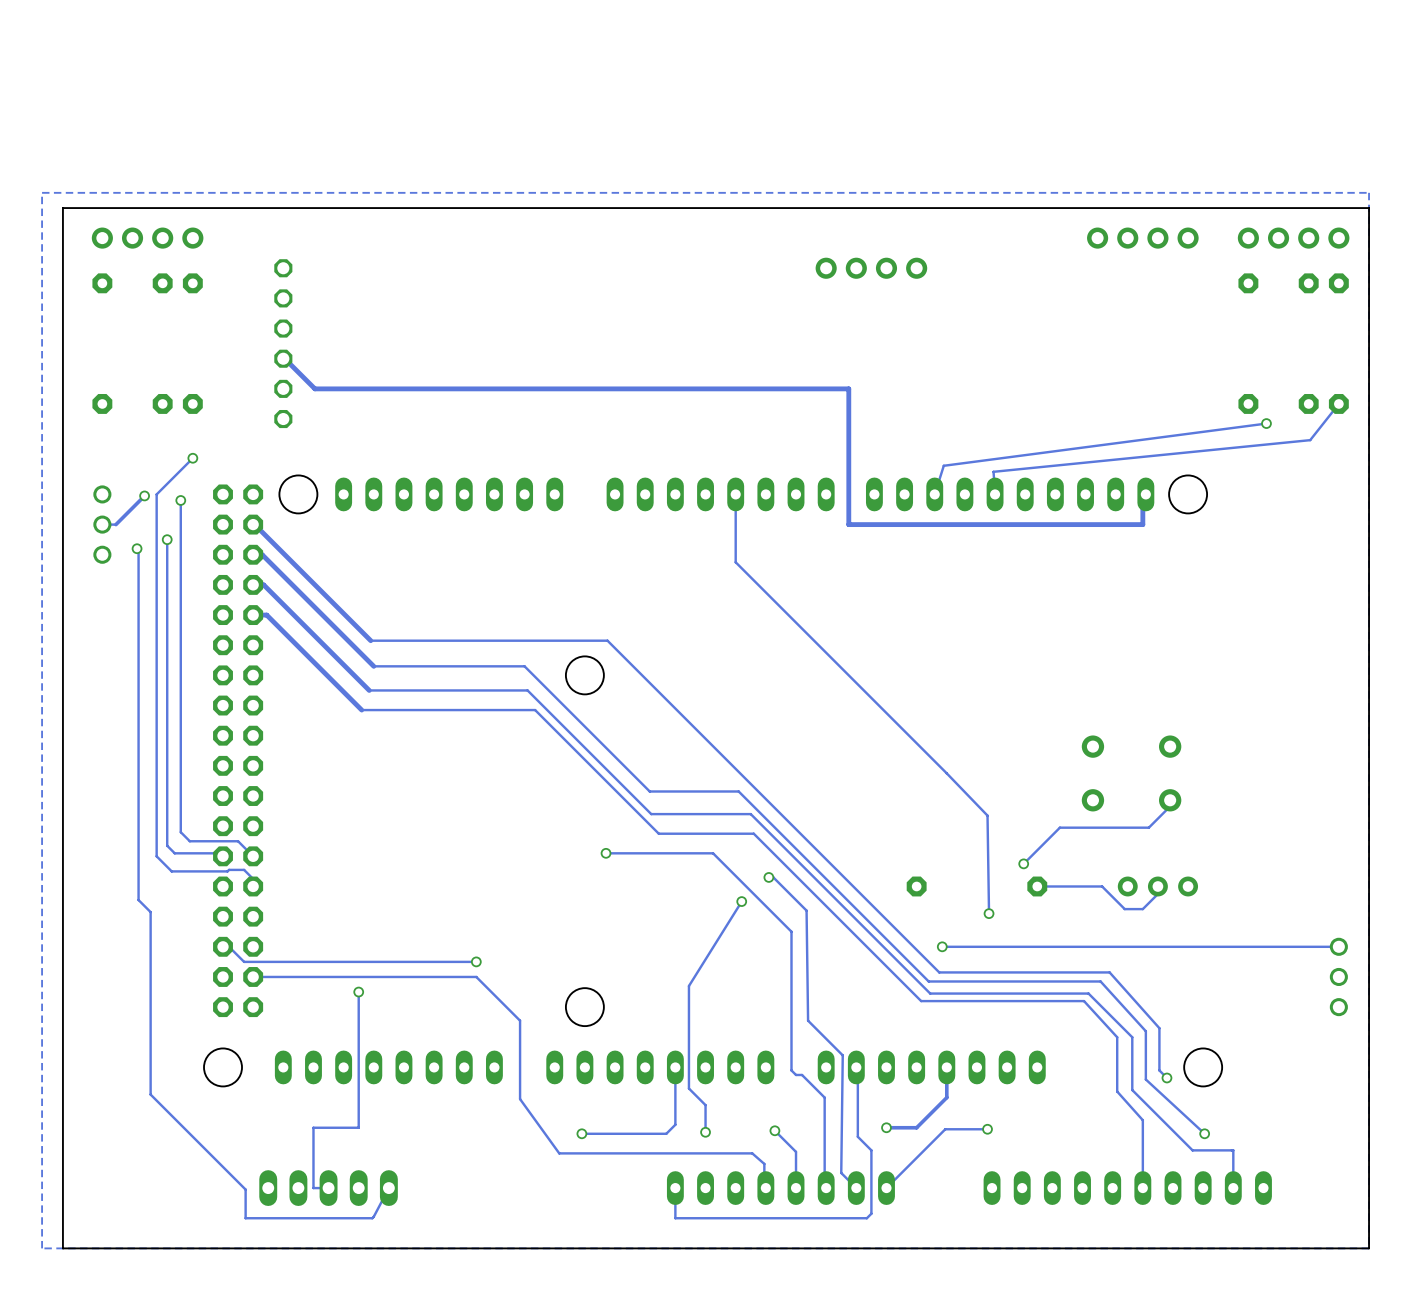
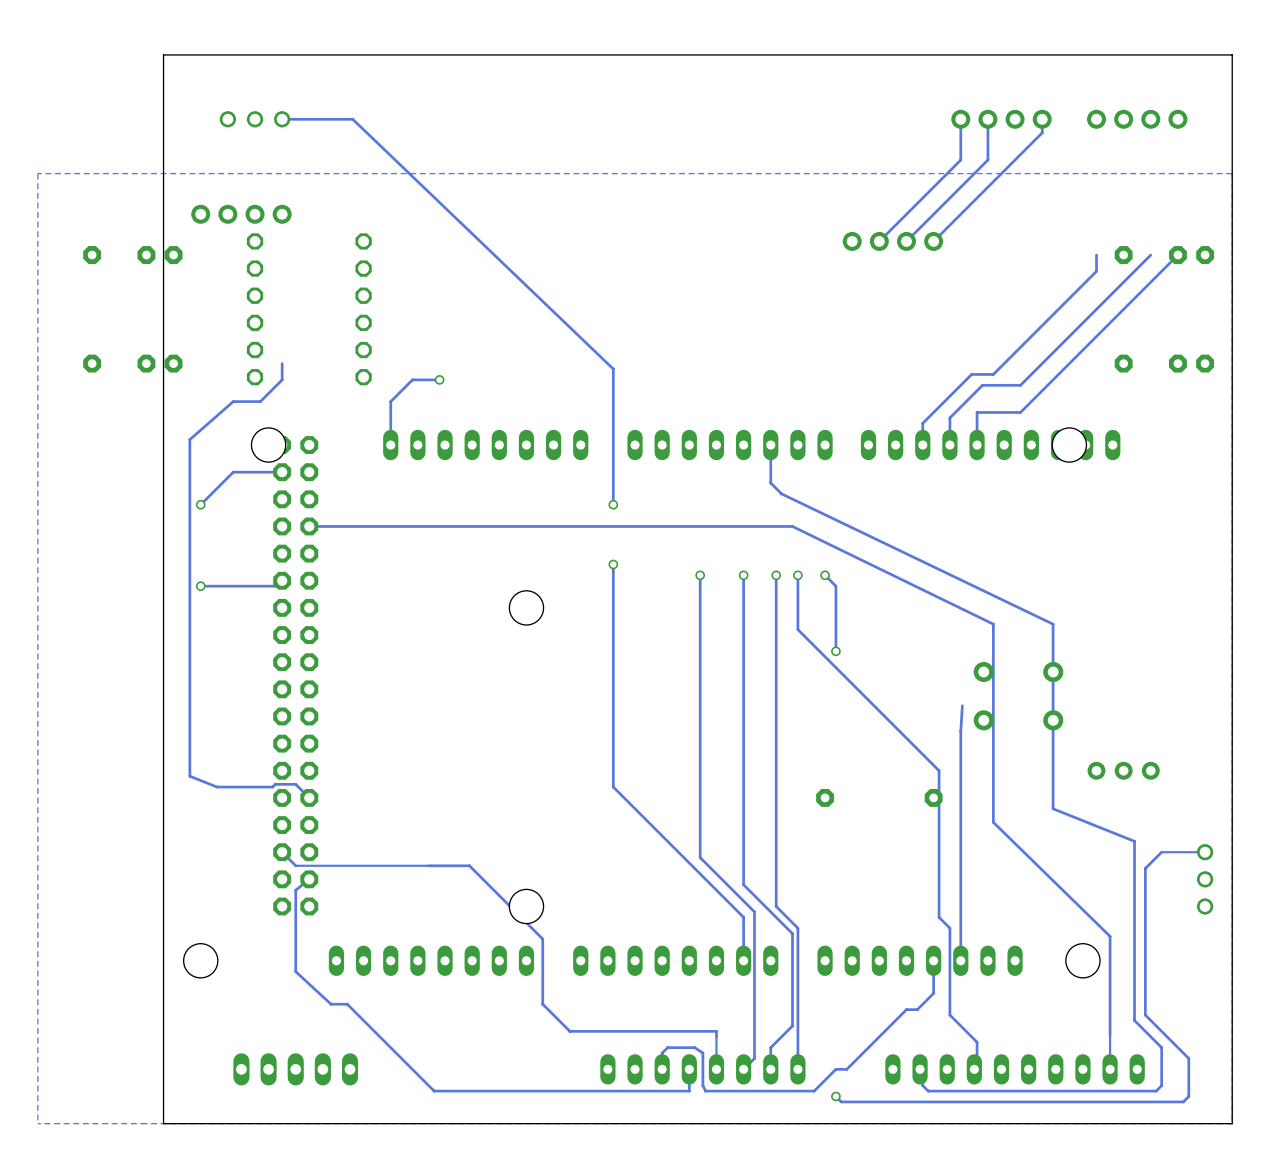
part: none -> (255, 119)
track: none -> (282, 119) (352, 119) (613, 369) (613, 504)
track: none -> (960, 119) (960, 160) (879, 241)
track: none -> (987, 119) (987, 160) (906, 241)
part: none -> (1001, 119)
track: none -> (1042, 119) (1042, 132) (933, 241)
part: none -> (1137, 119)
board edge: (1369, 208) (62, 208) (62, 1248) (181, 1248) -> (1232, 187) (1232, 54) (163, 54) (163, 1123)
part position: (147, 238) -> (241, 214)
part: (1142, 238) -> none
part: (1293, 238) -> none
part: (871, 268) -> none
part: none -> (892, 241)
track: none -> (1096, 255) (1096, 271) (993, 374) (971, 374) (922, 423) (922, 445)
track: none -> (1150, 255) (1020, 385) (982, 385) (949, 417) (949, 445)
track: none -> (1177, 255) (1020, 412) (977, 412) (977, 445)
part: none -> (363, 309)
track: (288, 362) (314, 388) (848, 388) (848, 524) (1142, 524) (1142, 494) (1145, 494) -> none
track: none -> (282, 363) (282, 379) (260, 401) (233, 401) (189, 439) (189, 776) (217, 787) (272, 787) (275, 784) (295, 784) (309, 797)
track: (1338, 403) (1310, 440) (993, 471) (995, 494) -> none
track: none -> (439, 379) (412, 379) (390, 401) (390, 445)
via: none -> (439, 379)
track: (1266, 423) (943, 465) (934, 494) -> none
via: (1266, 423) -> none
track: (192, 458) (156, 494) (156, 856) (171, 871) (244, 869) (253, 878) (253, 886) -> none
via: (192, 458) -> none
part: (449, 494) -> none
part: none -> (485, 445)
part: (720, 494) -> none
track: (735, 494) (735, 562) (987, 815) (989, 913) -> none
part: none -> (730, 445)
track: none -> (770, 445) (770, 483) (781, 493) (1053, 624) (1053, 808) (1134, 841) (1134, 1020) (1161, 1047) (1161, 1085) (1156, 1091) (928, 1091) (922, 1085) (922, 1072) (920, 1069)
part position: (1010, 494) -> (990, 445)
track: (144, 495) (115, 524) (102, 524) -> none
via: (144, 495) -> none
track: (180, 500) (180, 832) (189, 841) (238, 841) (253, 856) -> none
via: (180, 500) -> none
part: (102, 524) -> none
track: (253, 524) (370, 640) (607, 640) (939, 972) (1109, 972) (1159, 1028) (1159, 1070) (1166, 1077) -> none
track: none -> (282, 472) (233, 472) (200, 504)
track: (167, 539) (167, 845) (174, 853) (219, 853) (223, 856) -> none
via: (167, 539) -> none
track: (137, 548) (138, 550) (138, 900) (150, 912) (150, 1094) (245, 1189) (245, 1218) (372, 1218) (388, 1188) -> none
via: (137, 548) -> none
track: (253, 554) (262, 554) (373, 666) (524, 666) (649, 791) (738, 791) (928, 981) (1100, 981) (1145, 1031) (1145, 1079) (1204, 1133) -> none
via: none -> (200, 504)
via: none -> (613, 504)
track: (253, 584) (263, 584) (369, 690) (527, 690) (651, 814) (750, 814) (930, 993) (1088, 993) (1132, 1037) (1132, 1090) (1192, 1150) (1233, 1150) -> (309, 526) (792, 526) (993, 624) (993, 822) (1110, 936) (1110, 1035)
track: (253, 615) (266, 615) (361, 710) (535, 710) (658, 833) (753, 833) (921, 1001) (1084, 1001) (1117, 1037) (1117, 1091) (1142, 1120) (1142, 1188) -> none
track: none -> (613, 564) (613, 787) (743, 917) (743, 966)
via: none -> (613, 564)
via: none -> (700, 575)
track: none -> (743, 575) (743, 884) (792, 933) (792, 1025) (770, 1047) (770, 1074)
via: none -> (743, 575)
via: none -> (776, 575)
track: none -> (797, 575) (797, 629) (939, 770) (939, 917) (949, 928) (949, 1015) (977, 1042) (977, 1066) (974, 1069)
via: none -> (797, 575)
track: none -> (825, 575) (835, 586) (835, 651)
via: none -> (825, 575)
track: none -> (282, 580) (276, 586) (200, 586)
via: none -> (200, 586)
via: none -> (835, 651)
part position: (238, 750) -> (295, 675)
track: none -> (962, 705) (960, 960)
track: (1170, 800) (1170, 806) (1148, 827) (1059, 827) (1023, 863) -> none
track: (606, 853) (713, 853) (791, 931) (791, 1070) (796, 1074) (802, 1074) (824, 1097) (826, 1188) -> (700, 575) (700, 857) (754, 911) (754, 1058) (743, 1069)
via: (606, 853) -> none
via: (1023, 863) -> none
track: (768, 877) (773, 877) (806, 910) (808, 1020) (842, 1055) (841, 1172) (856, 1188) -> none
via: (768, 877) -> none
track: (1157, 886) (1159, 892) (1142, 909) (1124, 909) (1102, 886) (1037, 886) -> none
part position: (1157, 886) -> (1123, 770)
track: (741, 901) (688, 986) (688, 1088) (705, 1105) (705, 1132) -> none
via: (741, 901) -> none
via: (989, 913) -> none
track: (223, 946) (230, 948) (244, 961) (328, 961) -> (282, 852) (295, 865)
via: (942, 946) -> none
track: (1290, 946) (942, 946) -> (1161, 852) (1145, 868) (1145, 1015) (1188, 1058) (1188, 1096) (1183, 1101) (841, 1101) (835, 1096)
via: (476, 961) -> none
track: (253, 976) (476, 976) (520, 1020) (520, 1099) (559, 1153) (752, 1153) (764, 1163) (765, 1188) -> (309, 879) (295, 890) (295, 971) (331, 1004) (347, 1004) (434, 1091) (689, 1091) (689, 1069)
track: (358, 992) (358, 1127) (313, 1127) (313, 1188) (328, 1188) -> none
via: (358, 992) -> none
part: (388, 1067) -> none
part: none -> (431, 960)
part: (660, 1067) -> none
track: (675, 1067) (675, 1124) (666, 1133) (581, 1133) -> none
part: none -> (675, 960)
track: (856, 1067) (857, 1136) (871, 1150) (871, 1213) (866, 1218) (675, 1218) (675, 1188) -> none
part: (931, 1067) -> none
track: (946, 1067) (946, 1097) (916, 1127) (886, 1127) -> none
part: none -> (920, 960)
track: none -> (933, 960) (933, 993) (917, 1009) (906, 1009) (846, 1069) (835, 1069) (814, 1091) (705, 1091) (702, 1085) (702, 1053) (694, 1047) (667, 1047) (662, 1053) (662, 1069)
via: (1166, 1077) -> none
via: (886, 1127) -> none
track: (987, 1129) (945, 1129) (886, 1188) -> (776, 575) (776, 906) (797, 928) (797, 1069)
via: (987, 1129) -> none
track: (774, 1130) (796, 1151) -> (428, 865) (469, 865) (542, 939) (542, 1004) (569, 1031) (716, 1031) (716, 1036)
via: (774, 1130) -> none
via: (705, 1132) -> none
via: (581, 1133) -> none
via: (1204, 1133) -> none
via: none -> (835, 1096)

